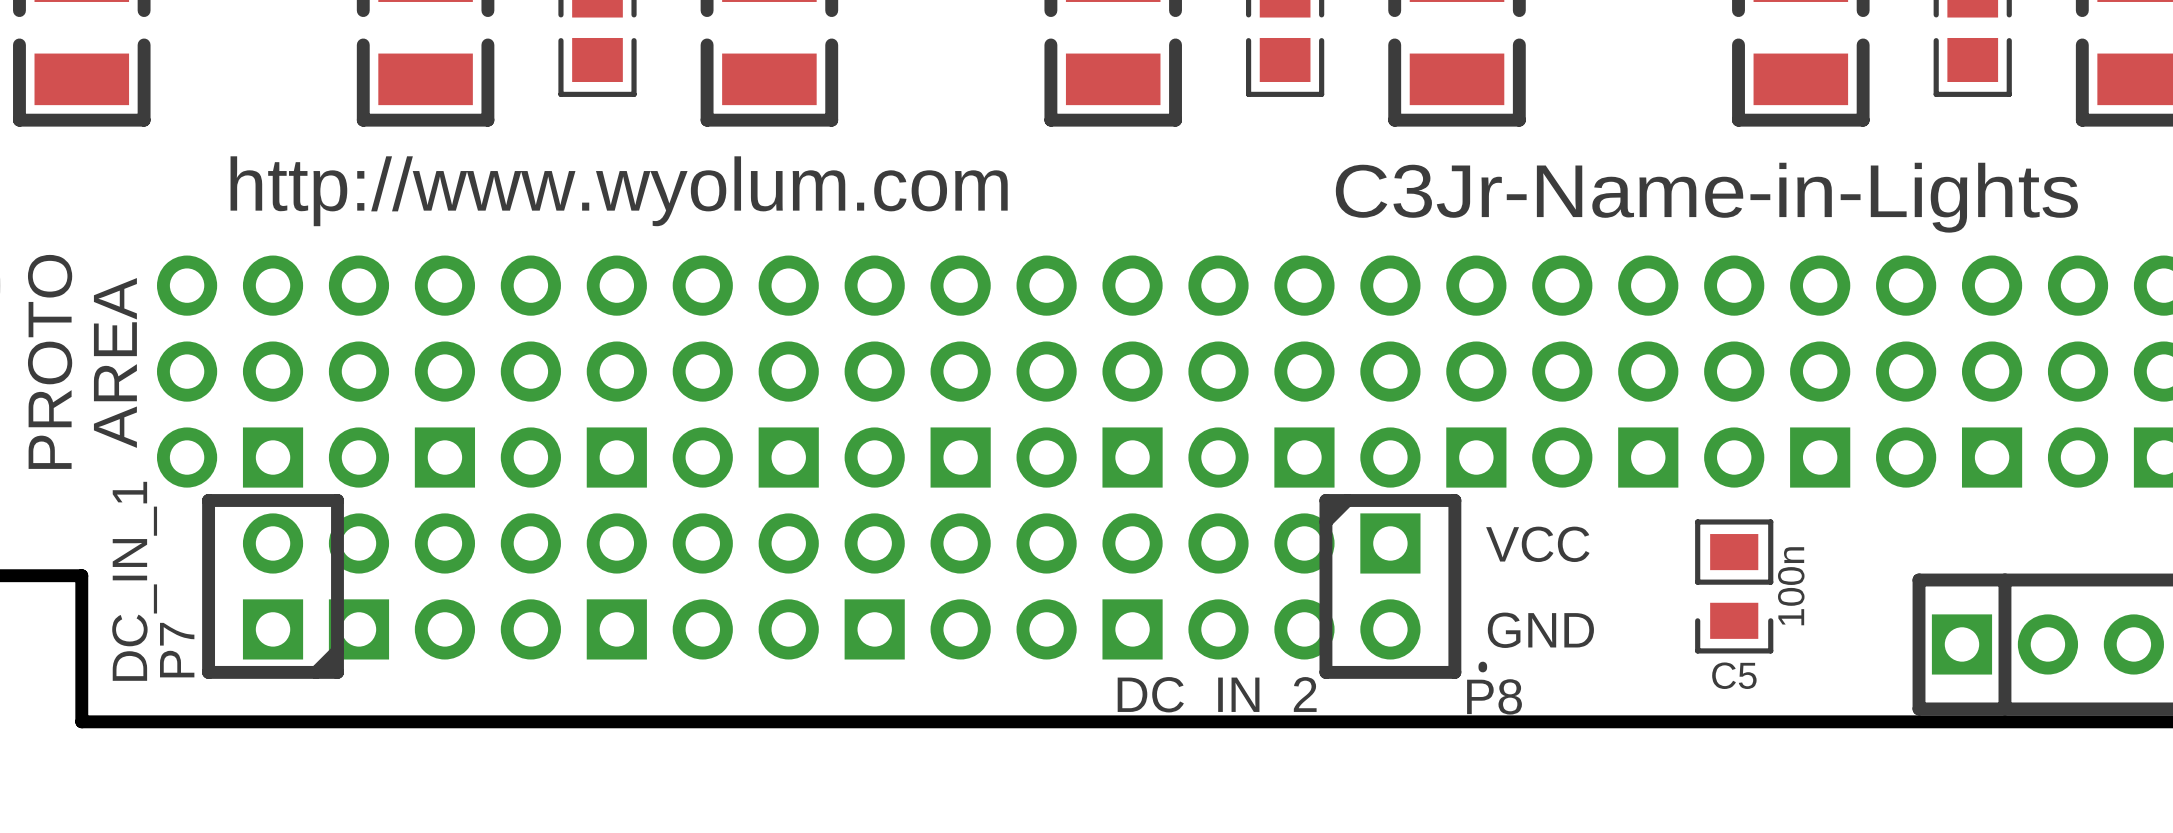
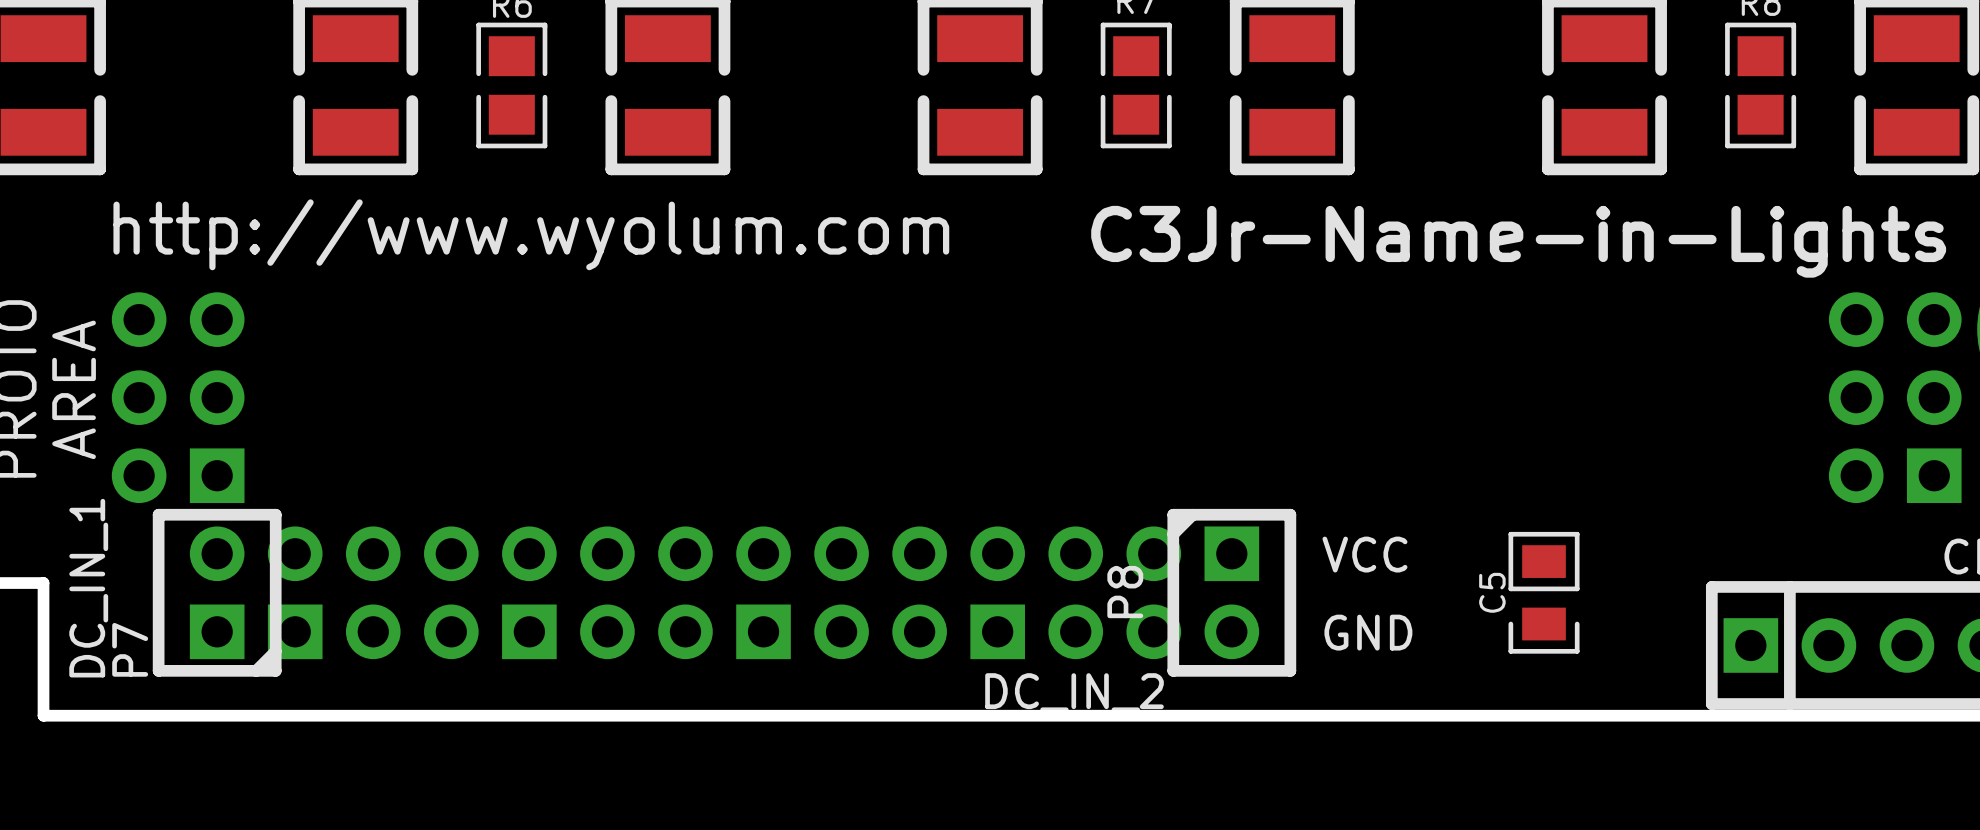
part: (401, 371) -> none
part: (573, 371) -> none
part: (745, 371) -> none
part: (917, 371) -> none
part: (1089, 371) -> none
part: (1261, 371) -> none
part: (1433, 371) -> none
part: (1605, 371) -> none
part: (1777, 371) -> none
part: (1949, 371) -> none
C5 value: 100n (1791, 586) -> none
line: (1482, 665) (1482, 668) -> none
C5 name rotation: 0° (1734, 675) -> 90° counterclockwise (1492, 592)
C5 name position: C5 (1734, 675) -> C5 (1492, 592)
P8 name rotation: 0° (1494, 696) -> 90° counterclockwise (1125, 592)
P8 name position: P8 (1494, 696) -> P8 (1125, 592)

